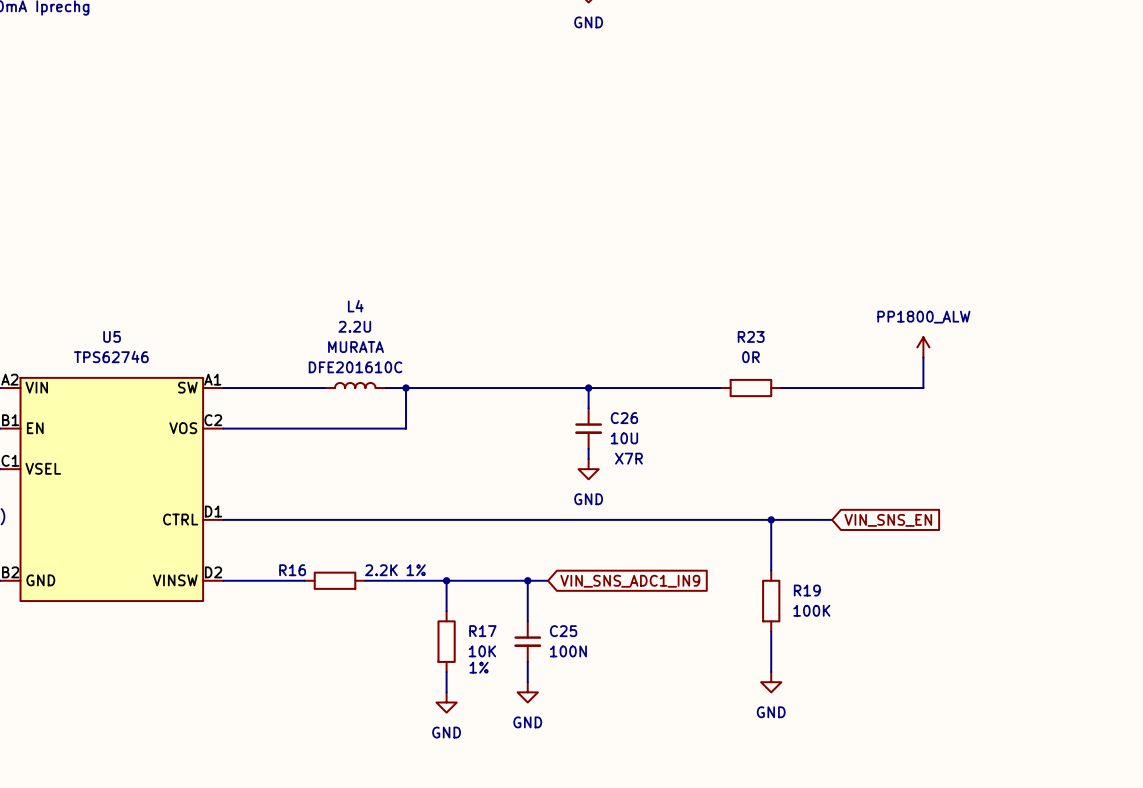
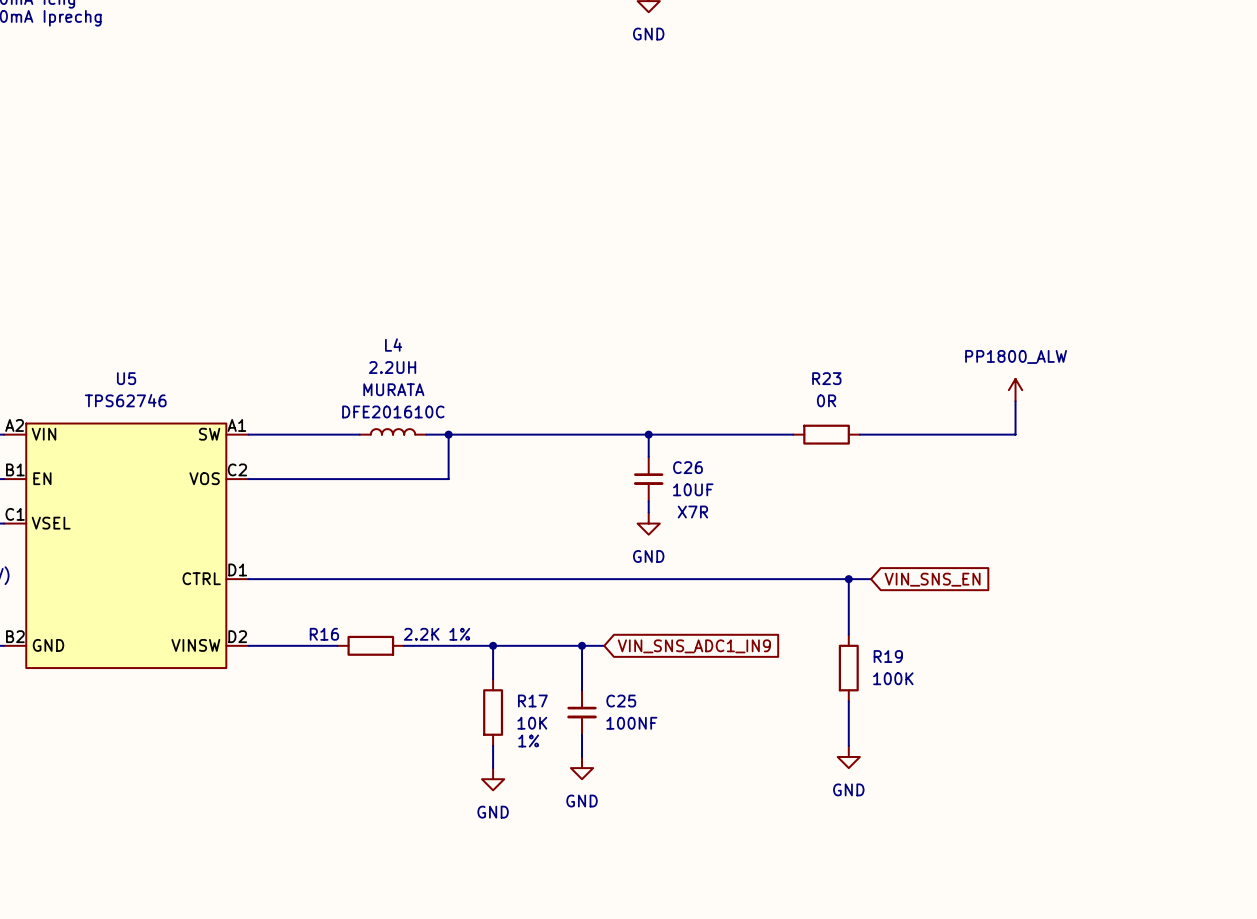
L4 value: 2.2U (354, 326) -> 2.2UH (392, 367)
C26 value: 10U (624, 438) -> 10UF (693, 489)
wire: (791, 519) (832, 519) -> none
global label position: VIN_SNS_EN (888, 520) -> VIN_SNS_EN (932, 579)
C25 value: 100N (568, 651) -> 100NF (631, 723)

